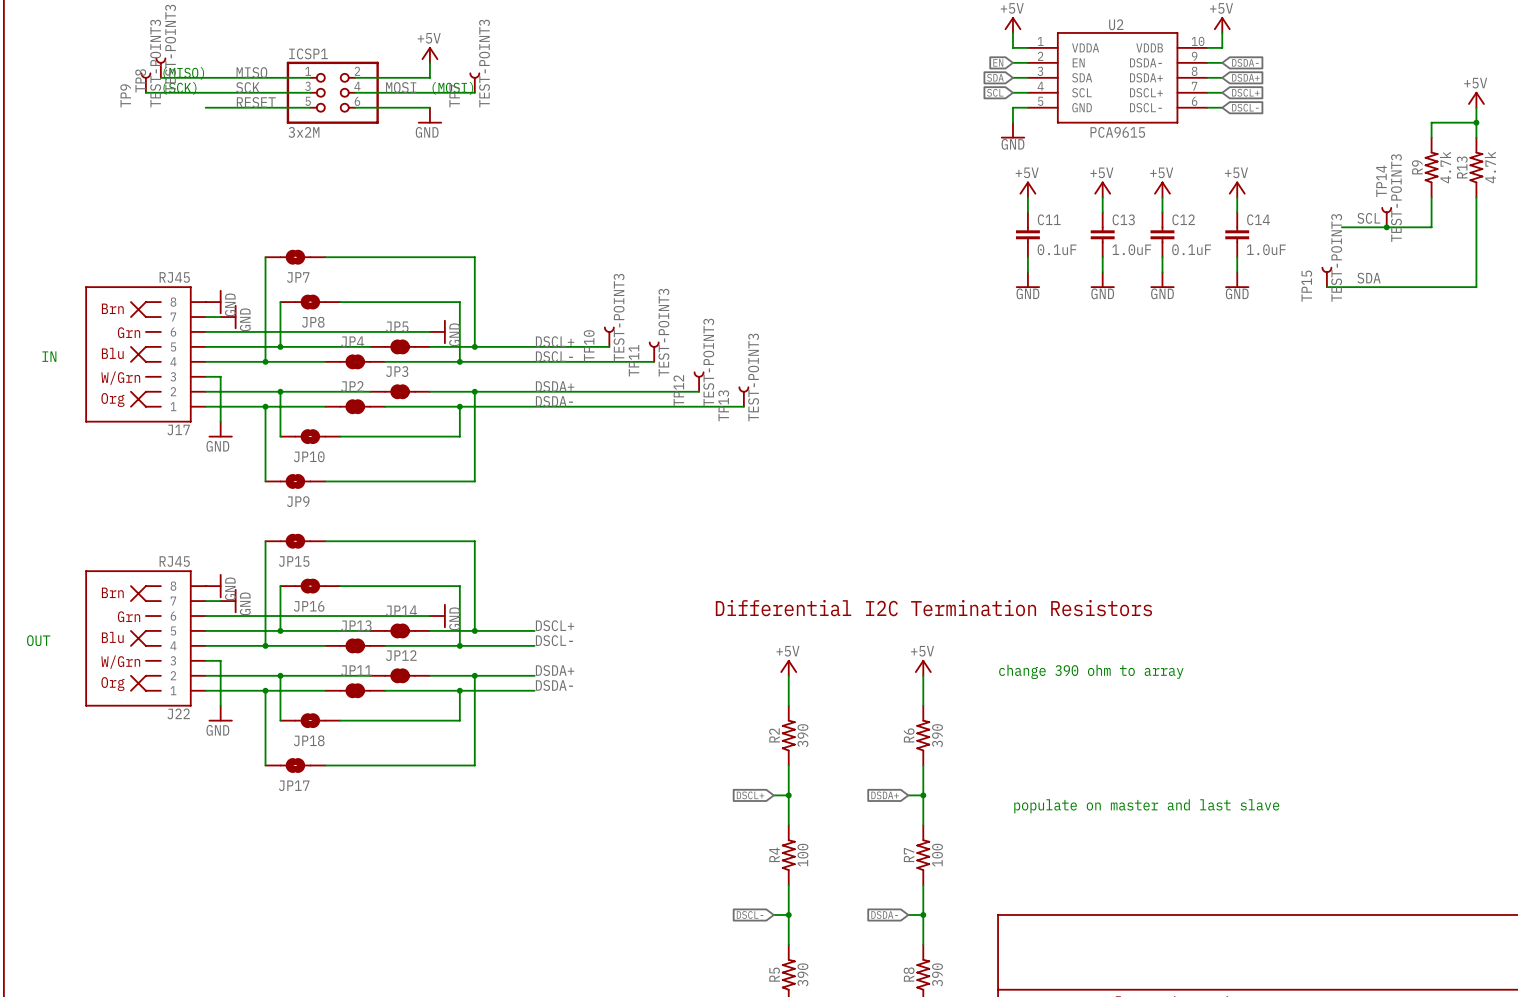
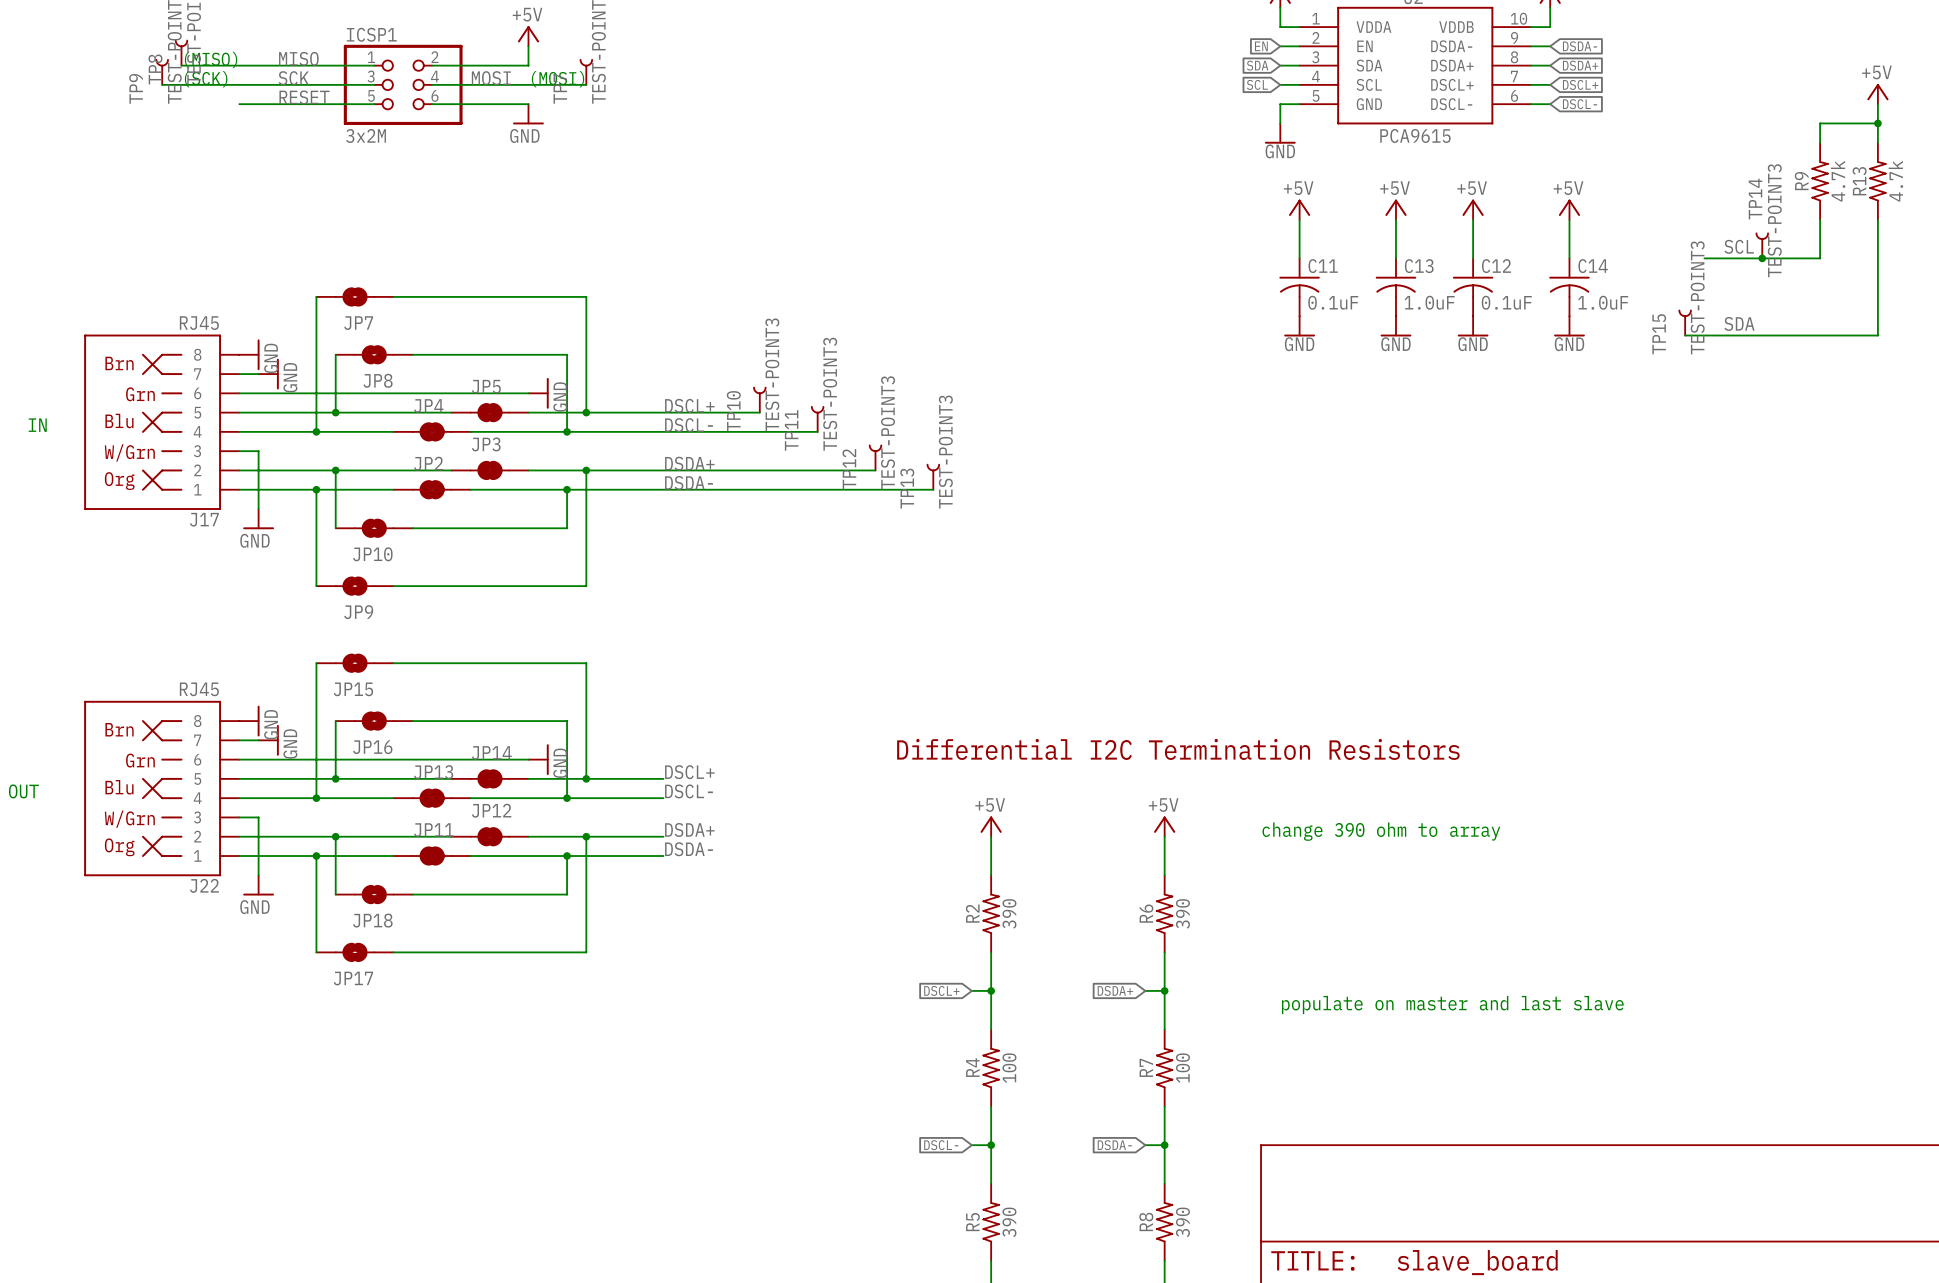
C11 symbol: [1015, 212, 1040, 258] -> [1279, 258, 1320, 317]
C13 symbol: [1090, 212, 1115, 258] -> [1375, 258, 1417, 317]
C12 symbol: [1150, 212, 1175, 258] -> [1452, 258, 1494, 317]
C14 symbol: [1225, 212, 1250, 258] -> [1549, 258, 1590, 317]

